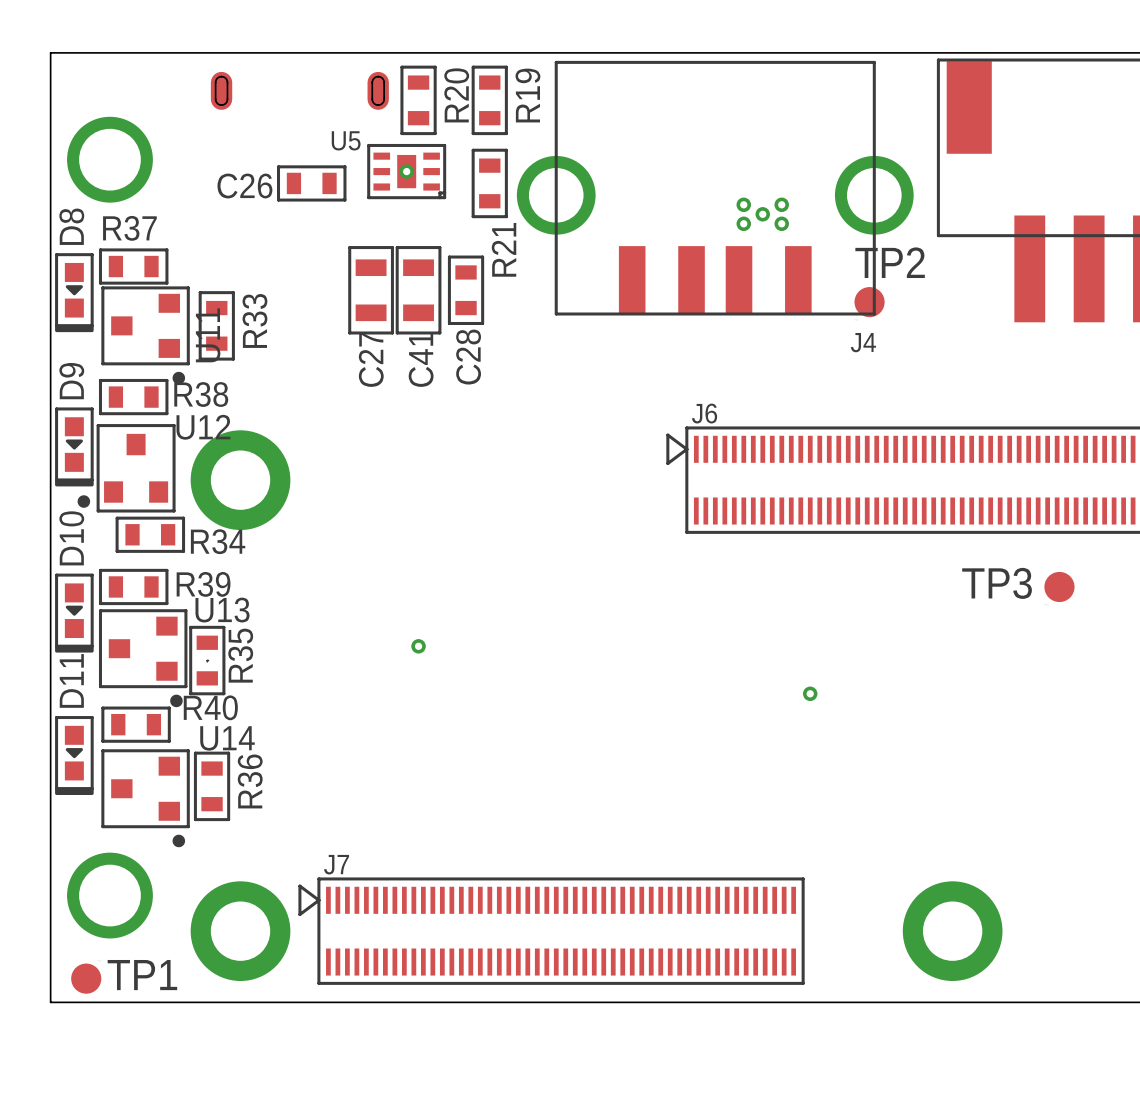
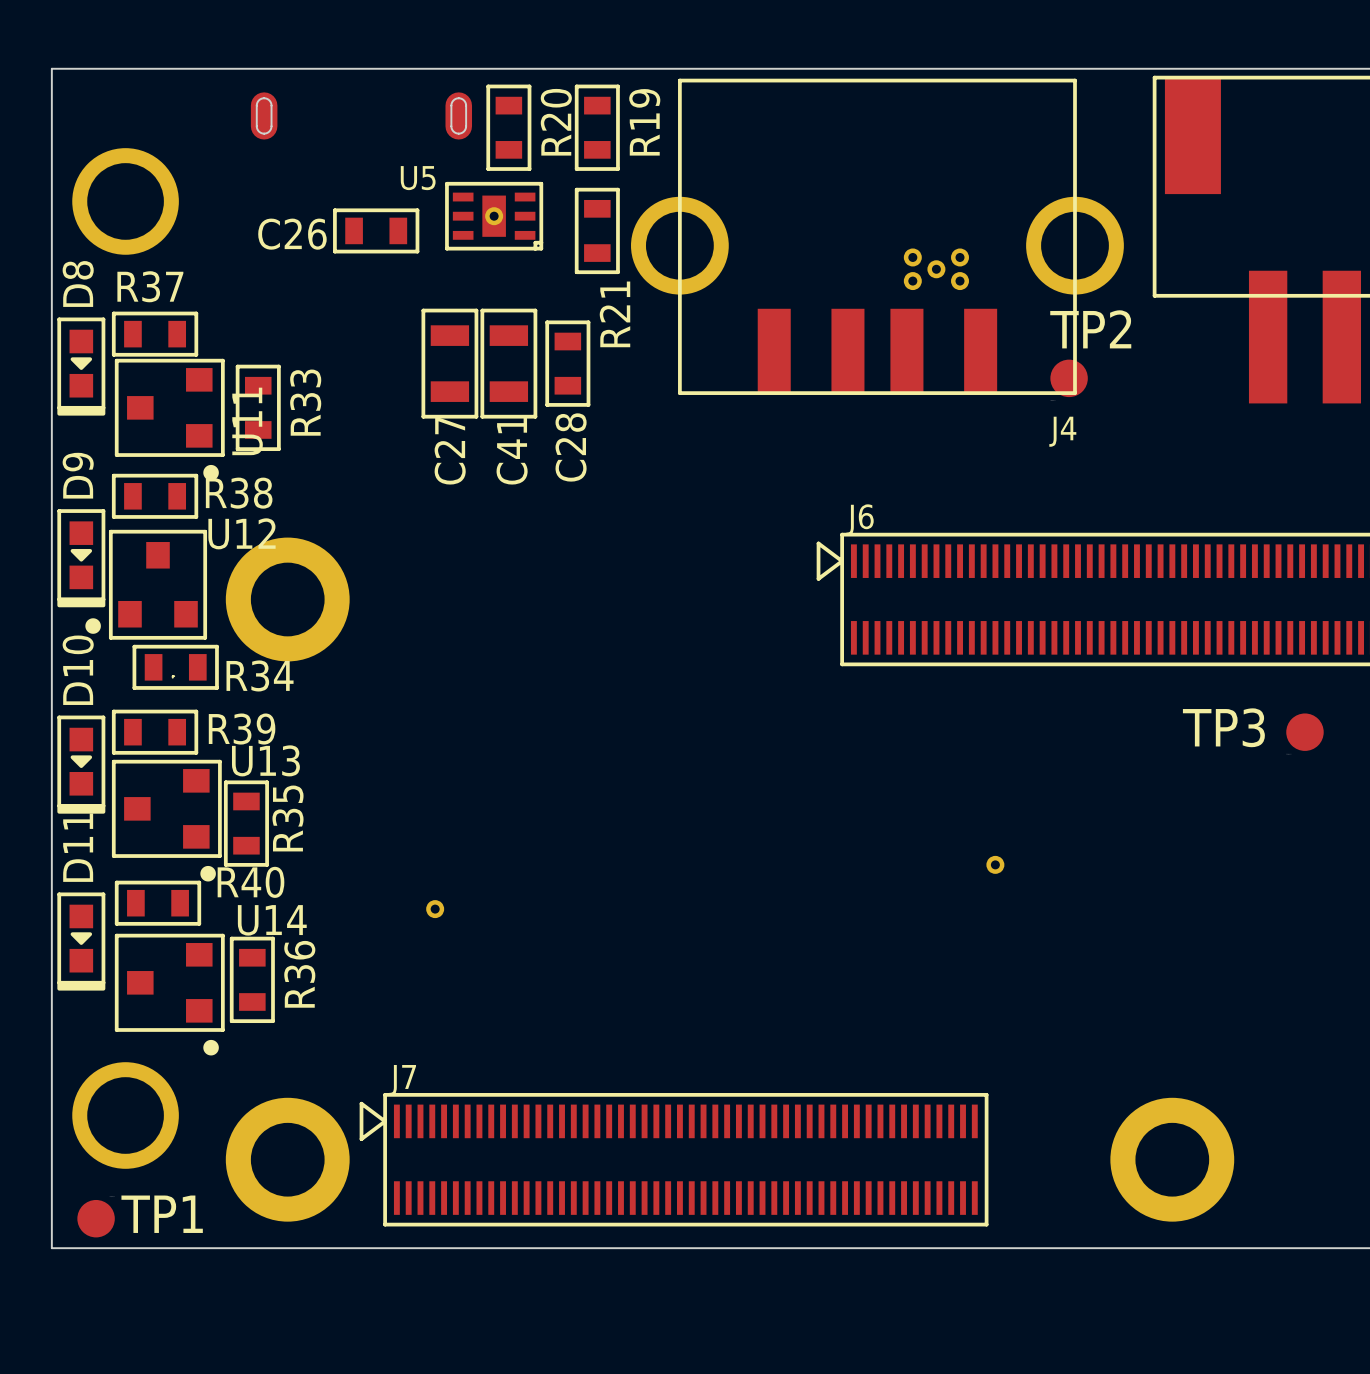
part position: (418, 646) -> (435, 909)
part position: (207, 661) -> (173, 676)

